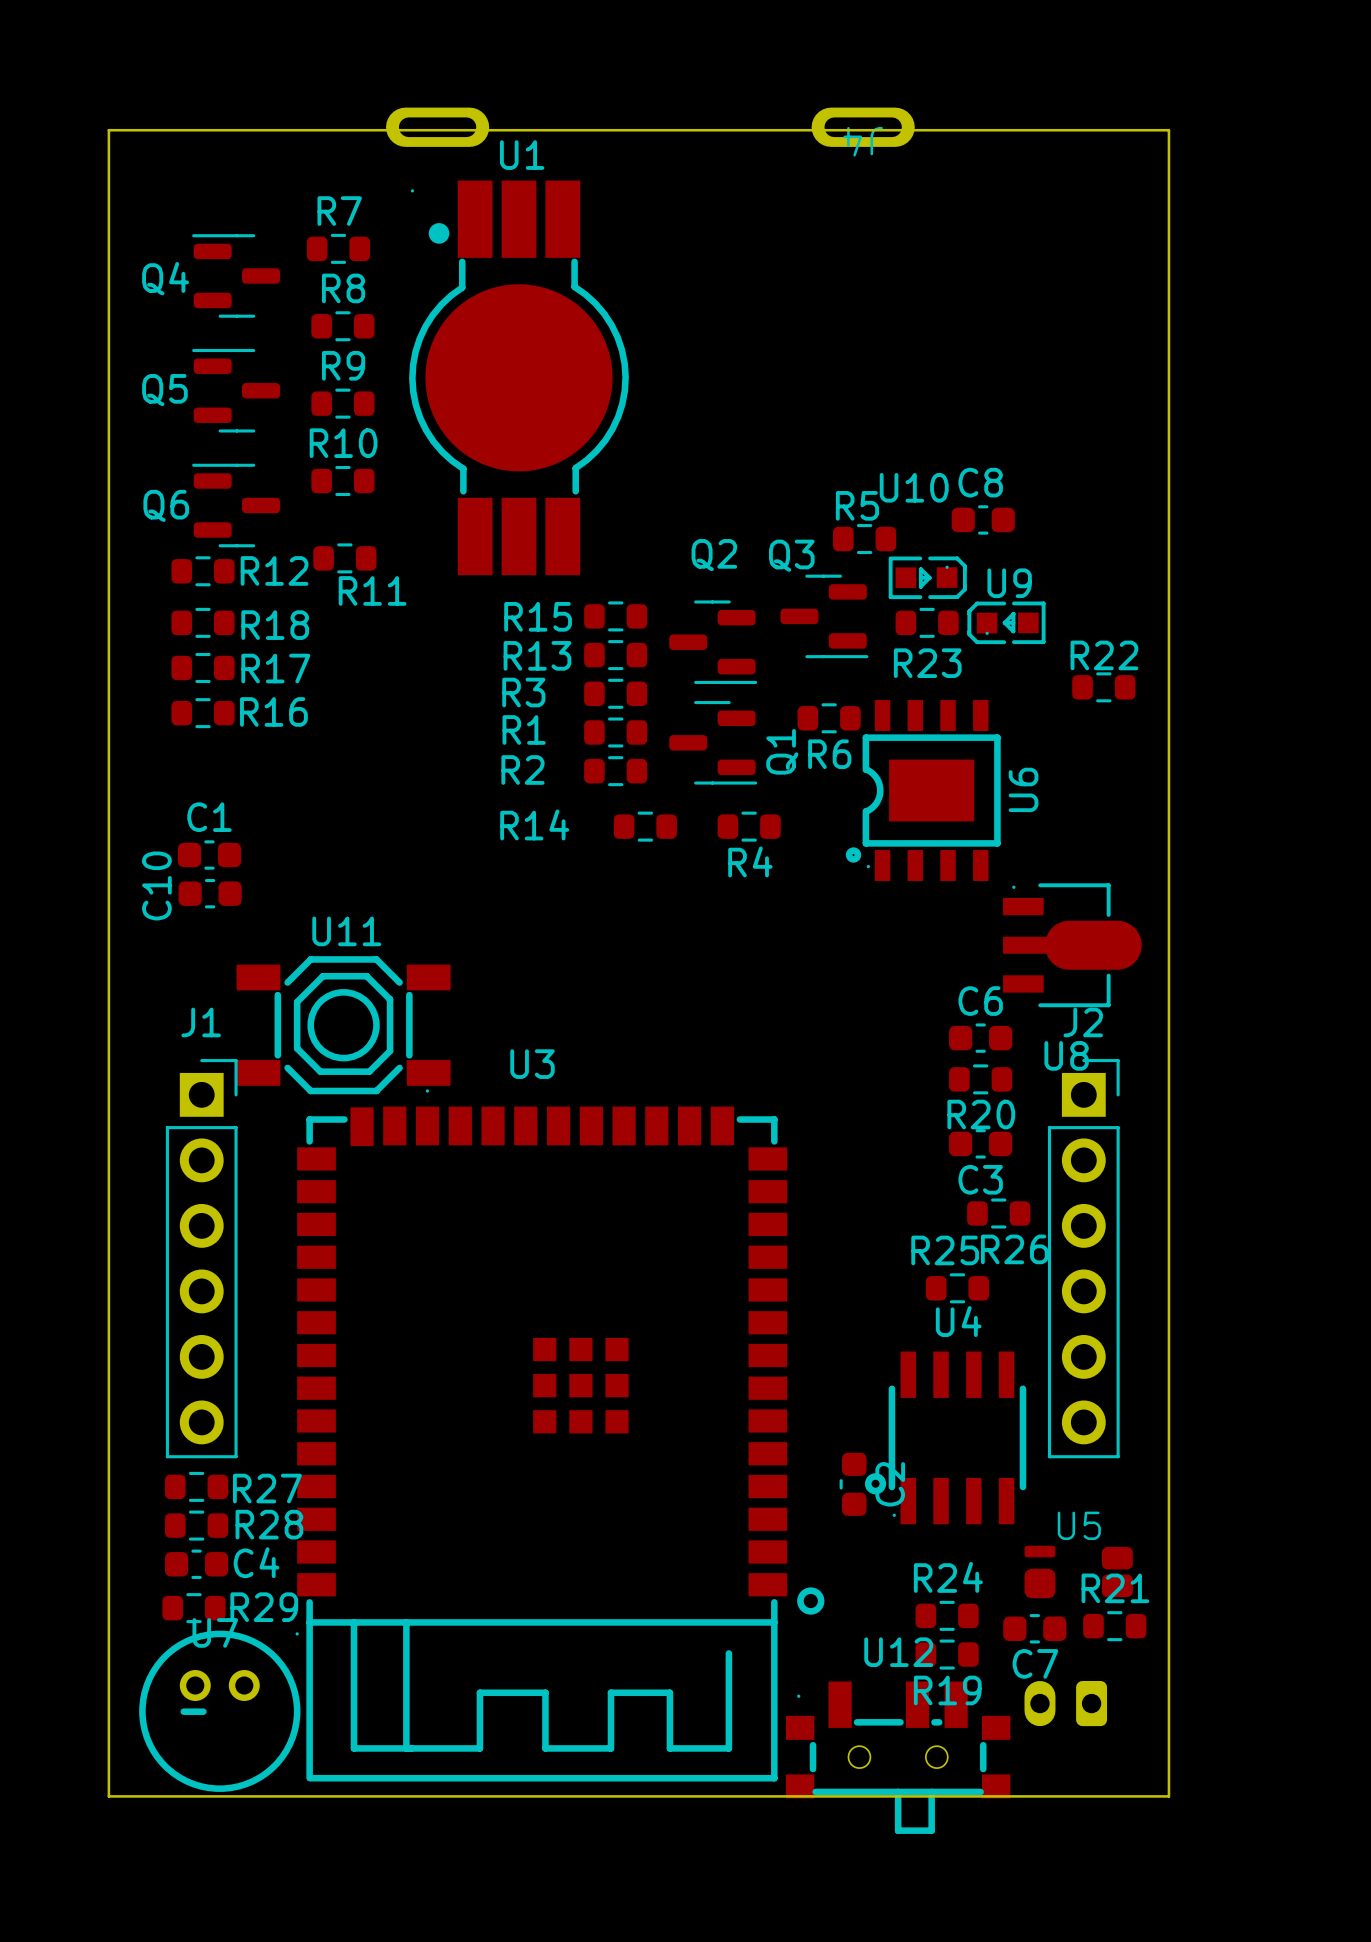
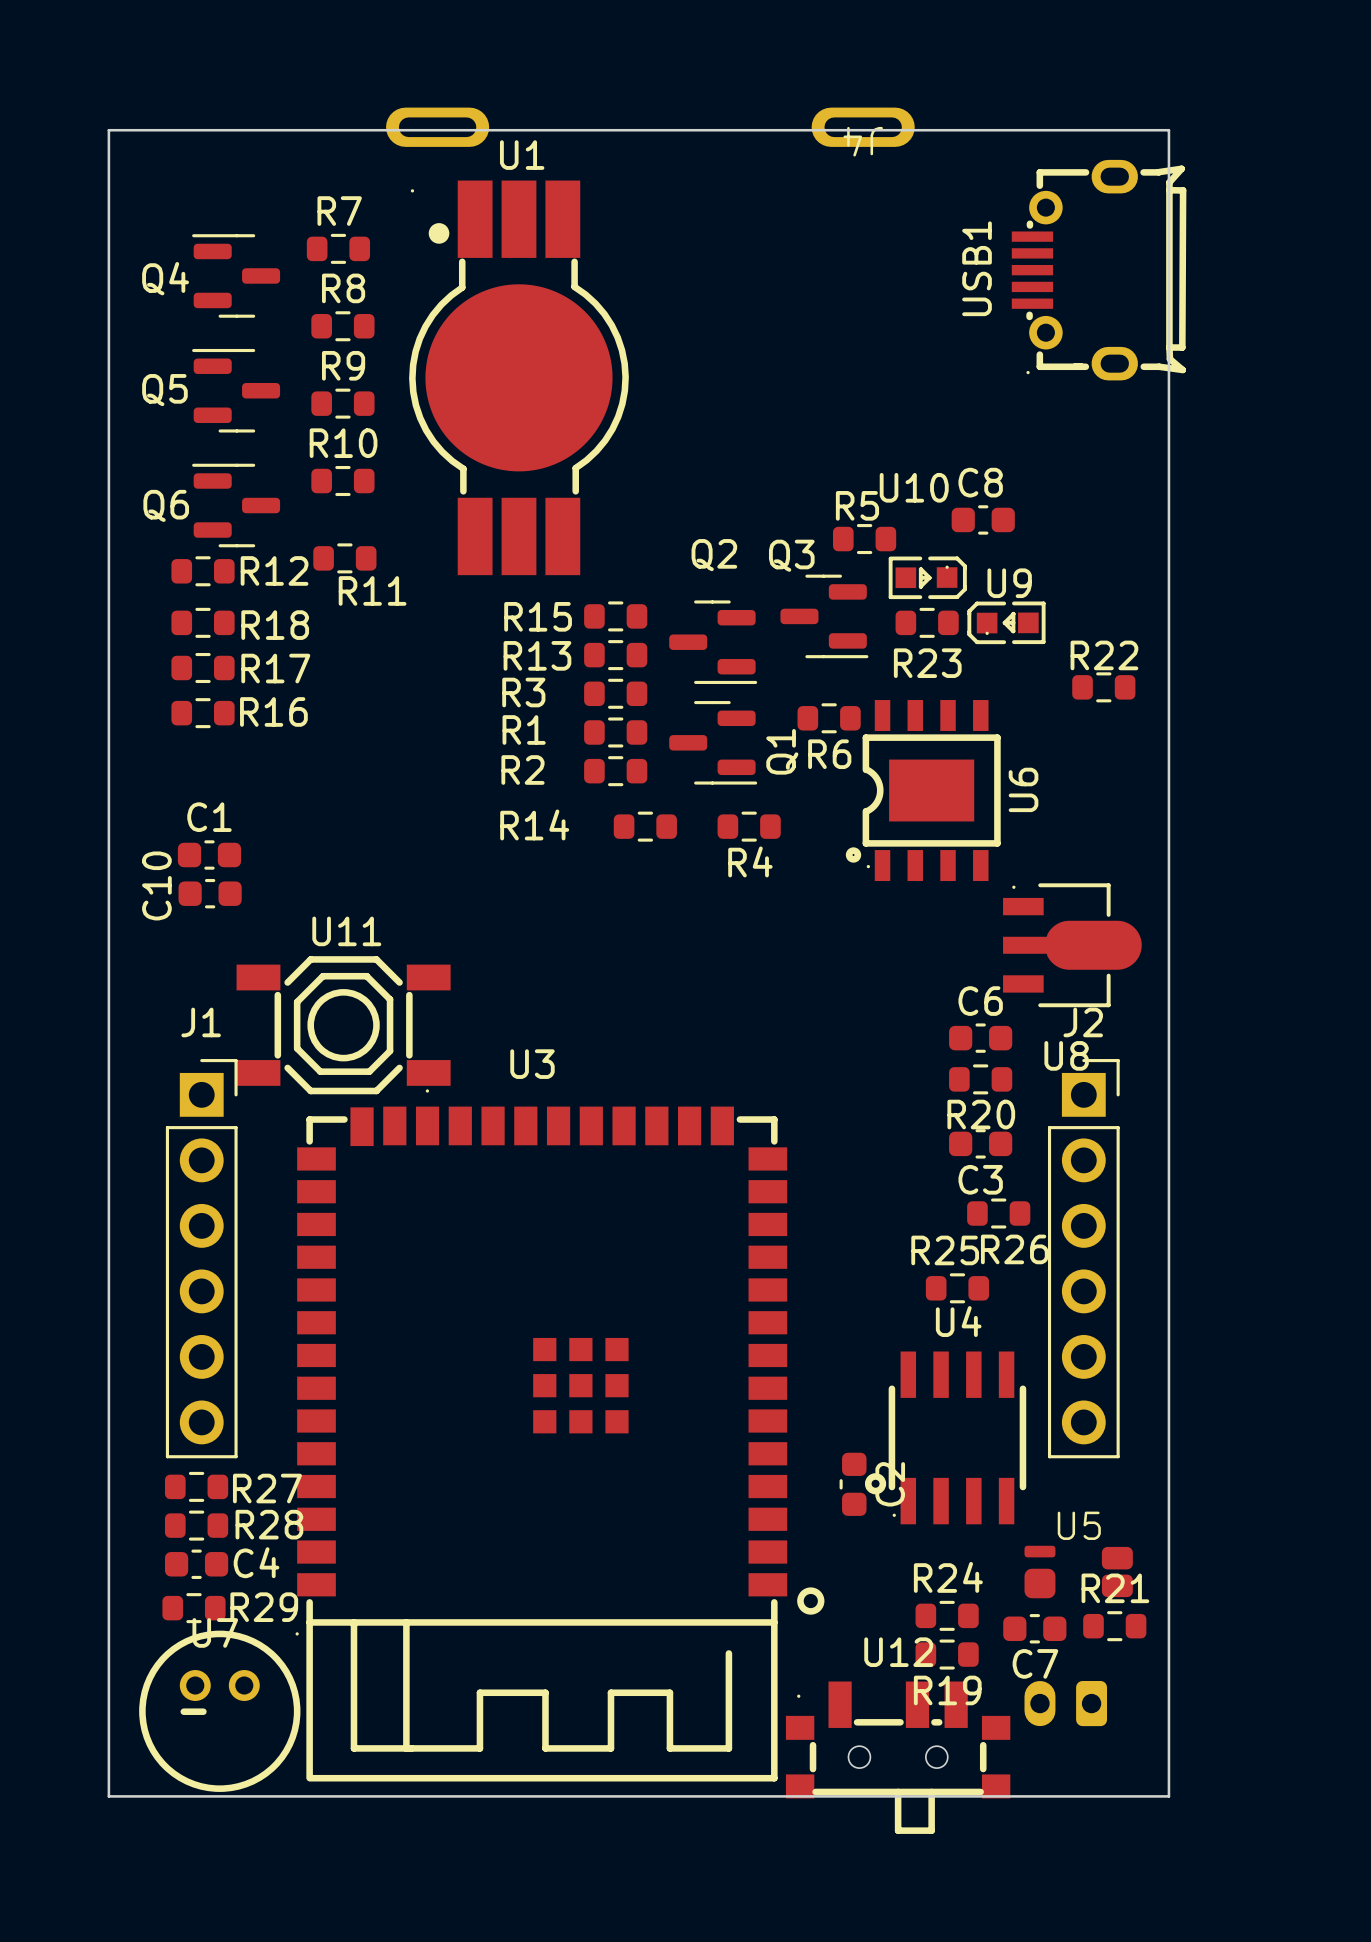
USB1: none -> (1099, 270)

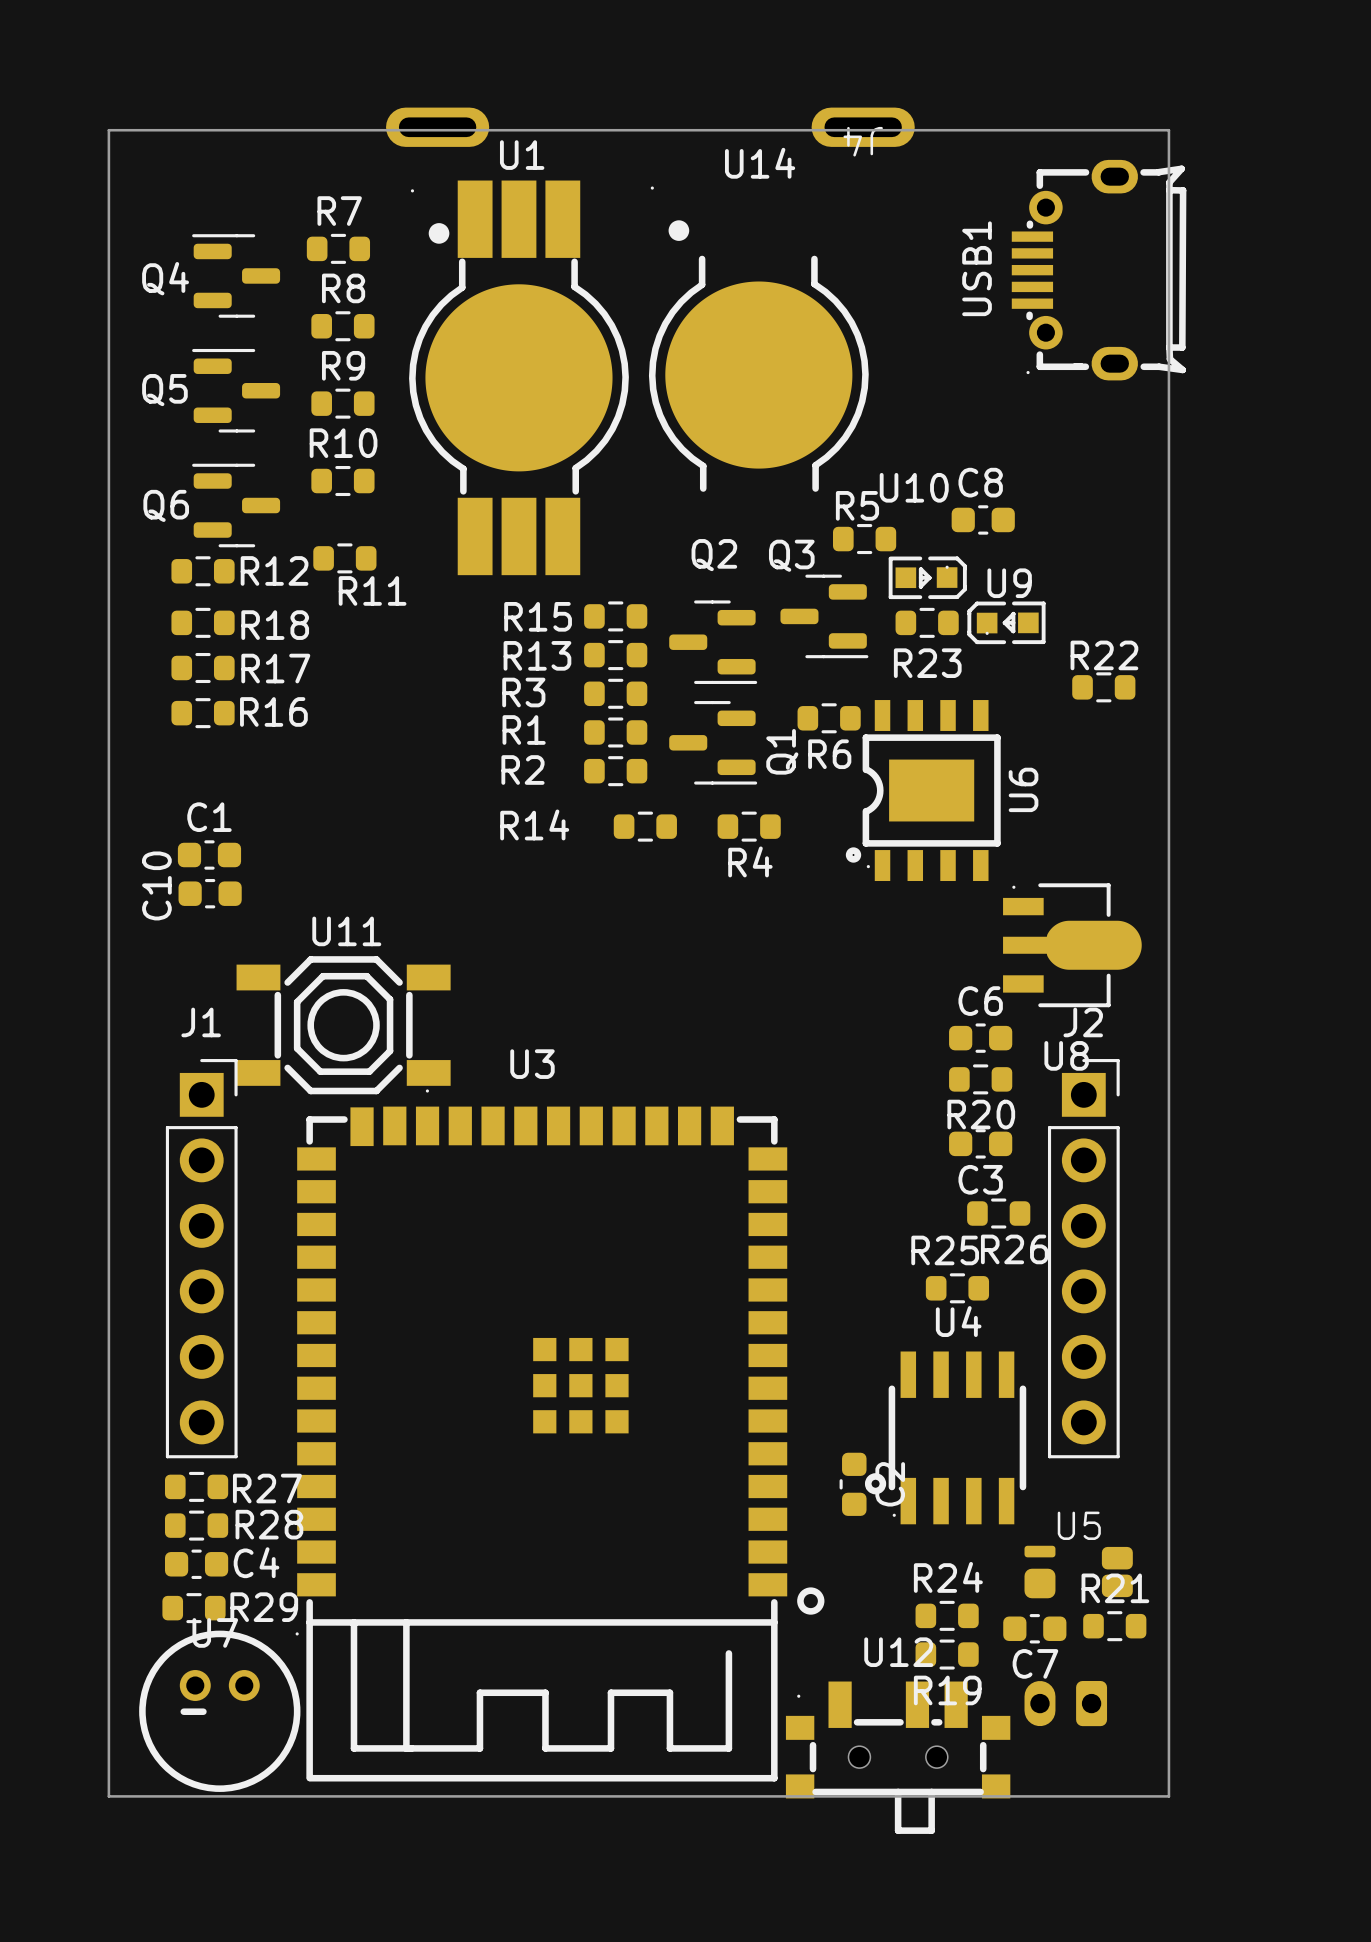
U14: none -> (758, 339)

